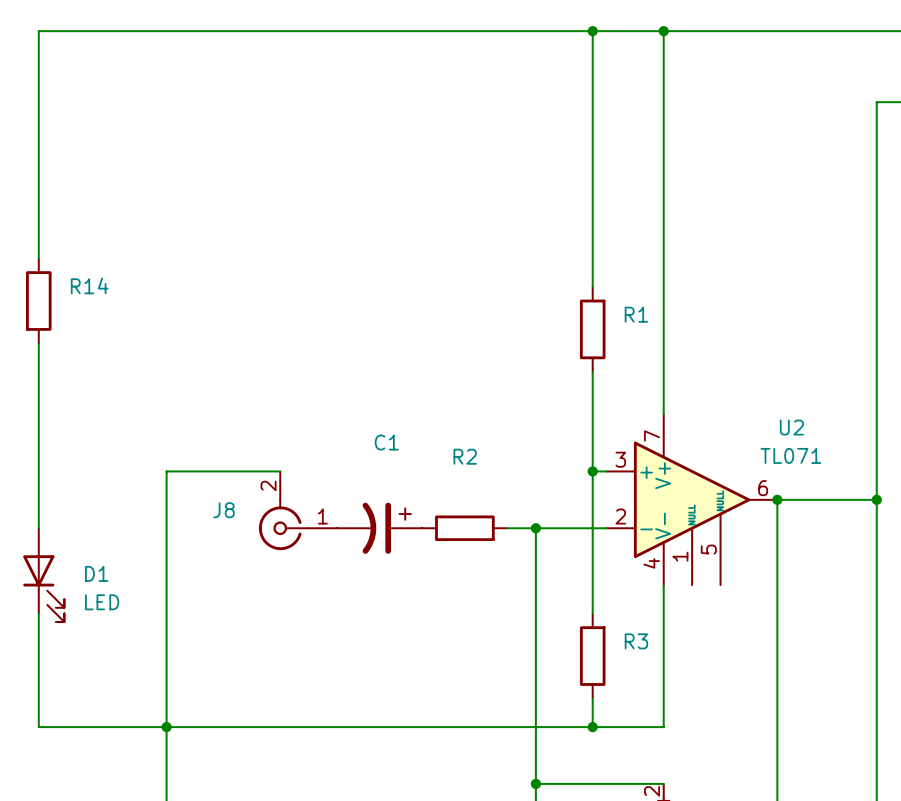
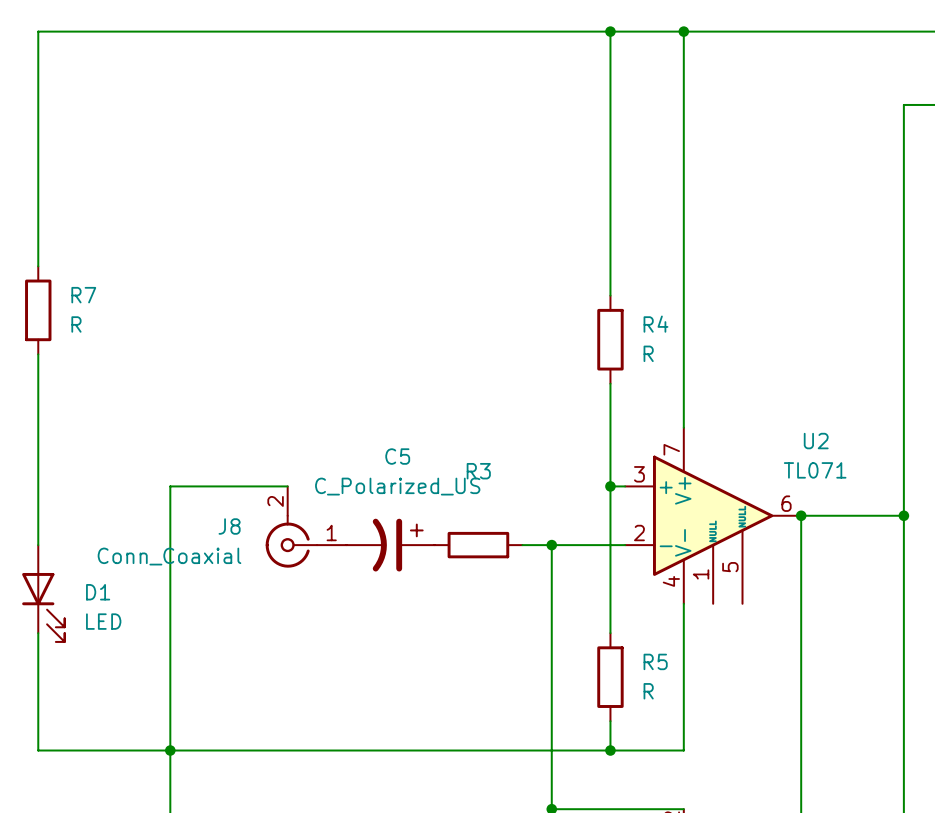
R14 name: R14 (89, 285) -> R7 (83, 295)
R14 value: none -> R (76, 324)
R1 name: R1 (636, 314) -> R4 (655, 324)
R1 value: none -> R (648, 353)
C1 name: C1 (386, 442) -> C5 (397, 456)
R2 name: R2 (465, 456) -> R3 (478, 471)
C1 value: none -> C_Polarized_US (397, 486)
J8 value: none -> Conn_Coaxial (169, 556)
R3 name: R3 (636, 641) -> R5 (655, 661)
R3 value: none -> R (648, 691)

